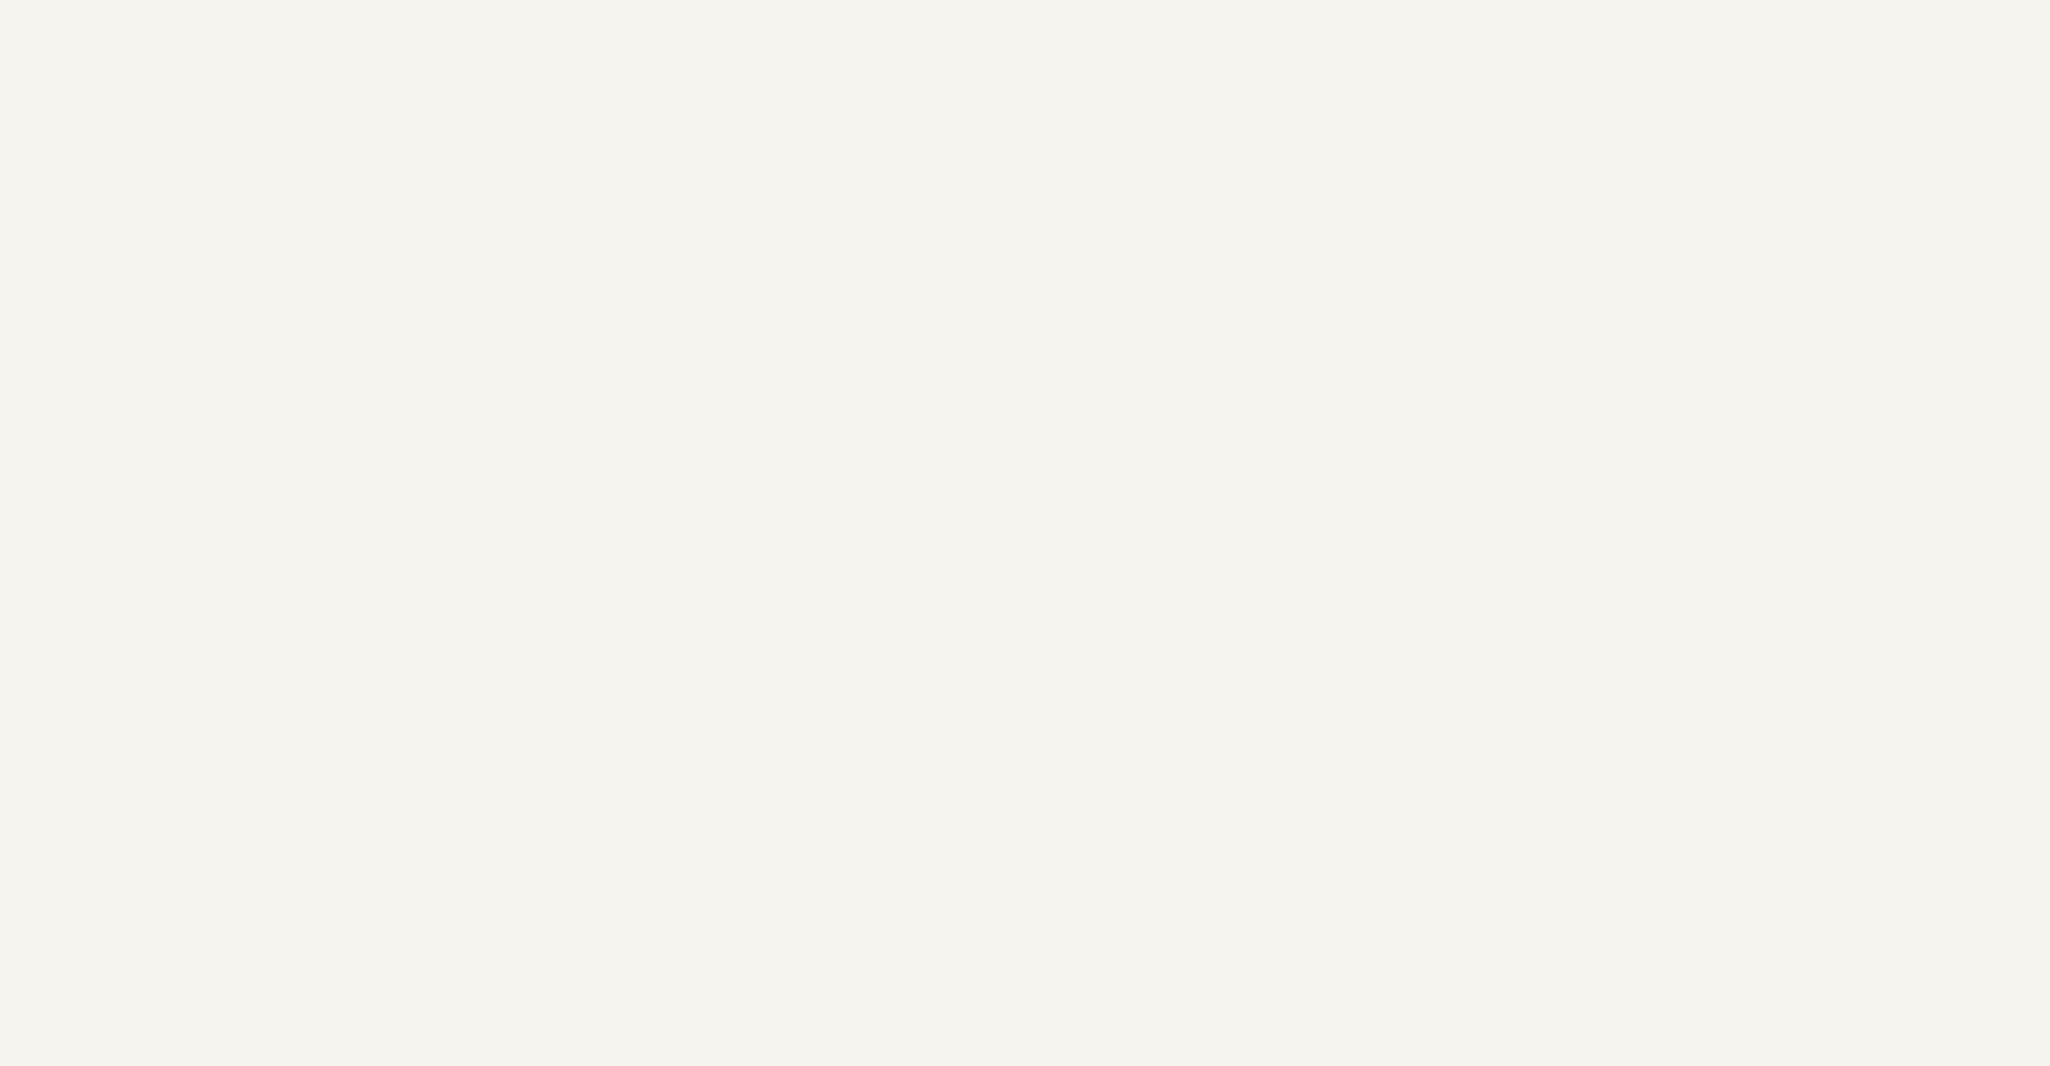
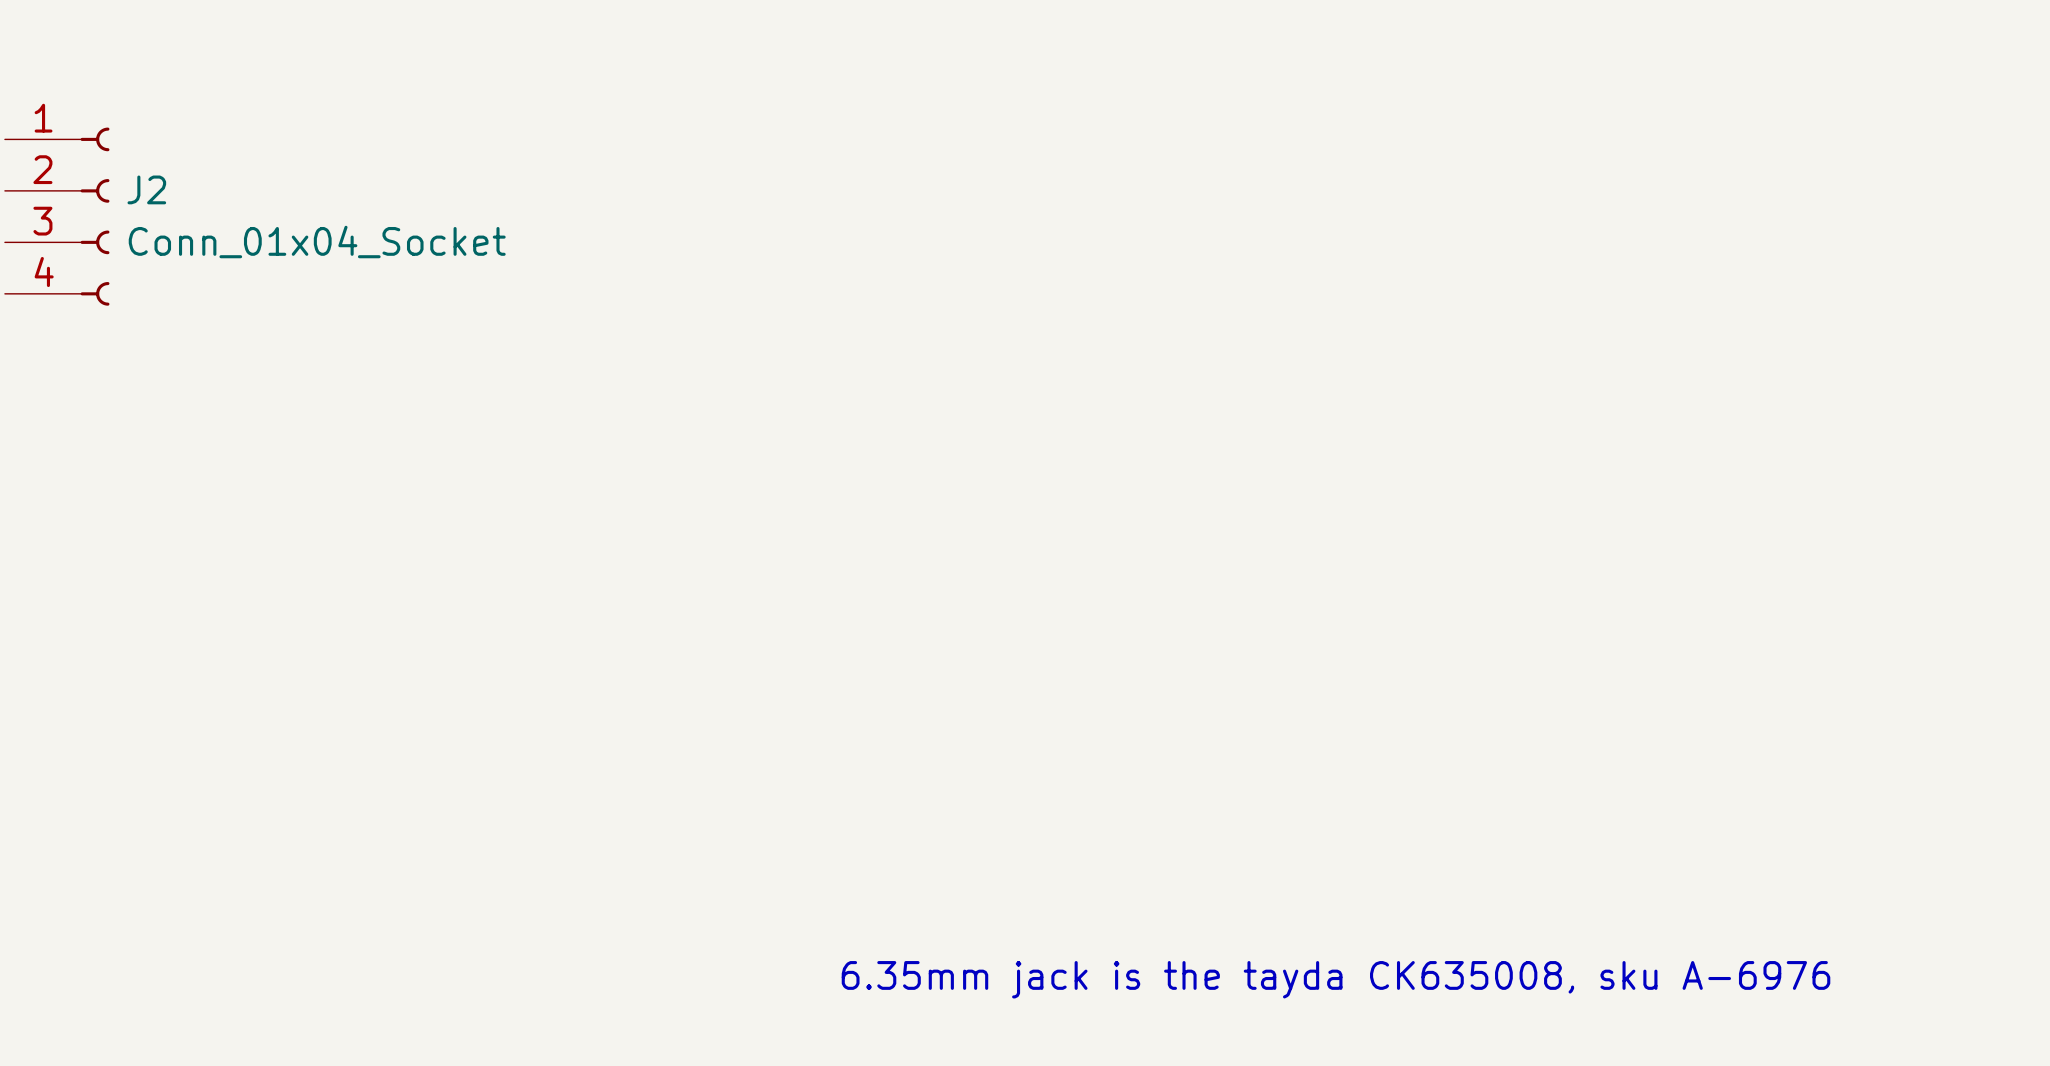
J2: none -> Conn_01x04_Socket (57, 216)
text: none -> 6.35mm jack is the tayda CK635008, sku A-6976 (1336, 979)

